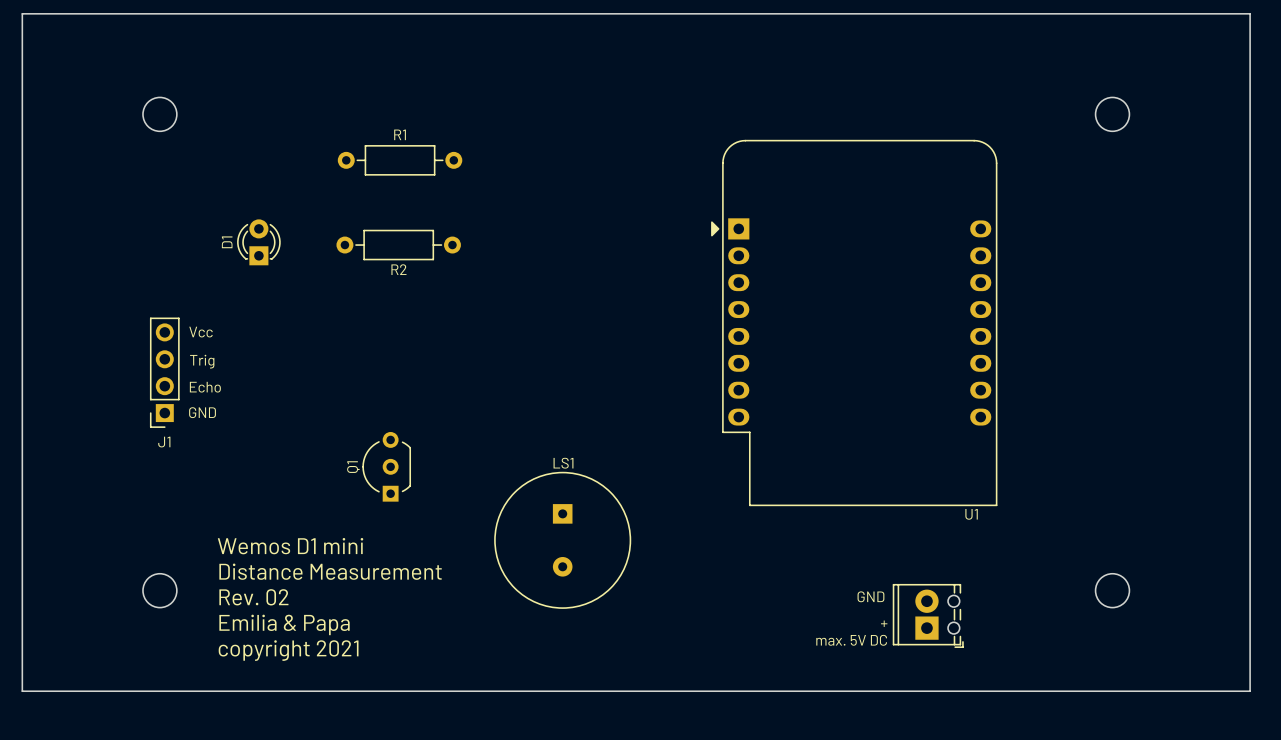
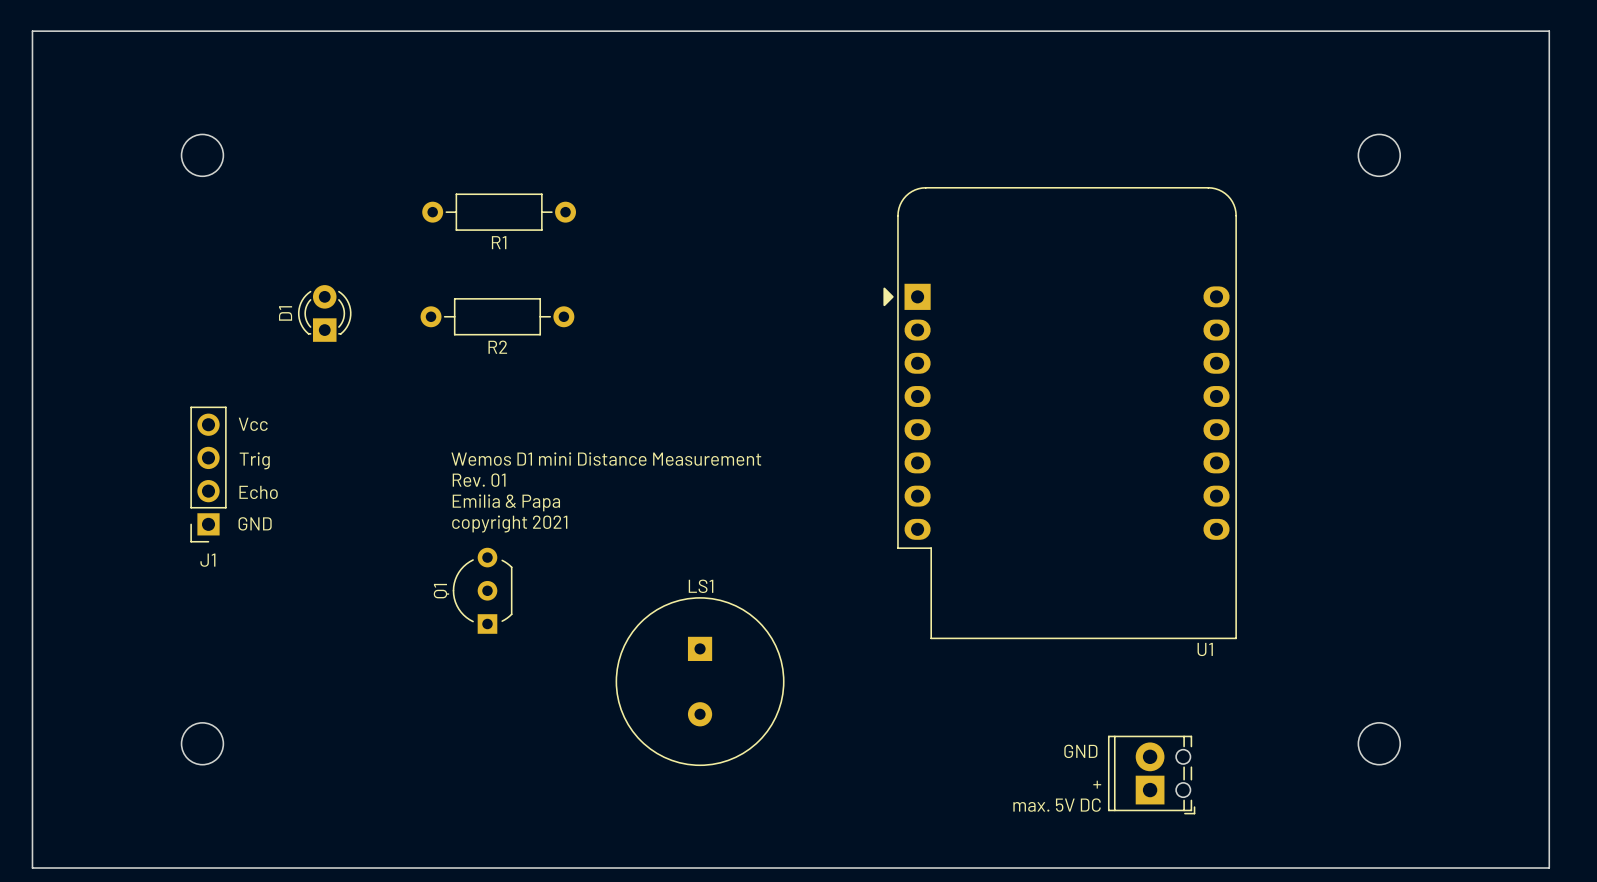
R1 name position: R1 (400, 134) -> R1 (499, 242)
text: none -> Wemos D1 mini Distance Measurement (606, 459)
text: none -> Rev. 01 (479, 480)
text: none -> Emilia & Papa (506, 502)
text: none -> copyright 2021 (509, 524)
text: Wemos D1 mini (290, 546) -> none
text: Distance Measurement (330, 571) -> none
text: Rev. 02 (253, 597) -> none
text: Emilia & Papa (284, 624) -> none
text: copyright 2021 (288, 650) -> none

